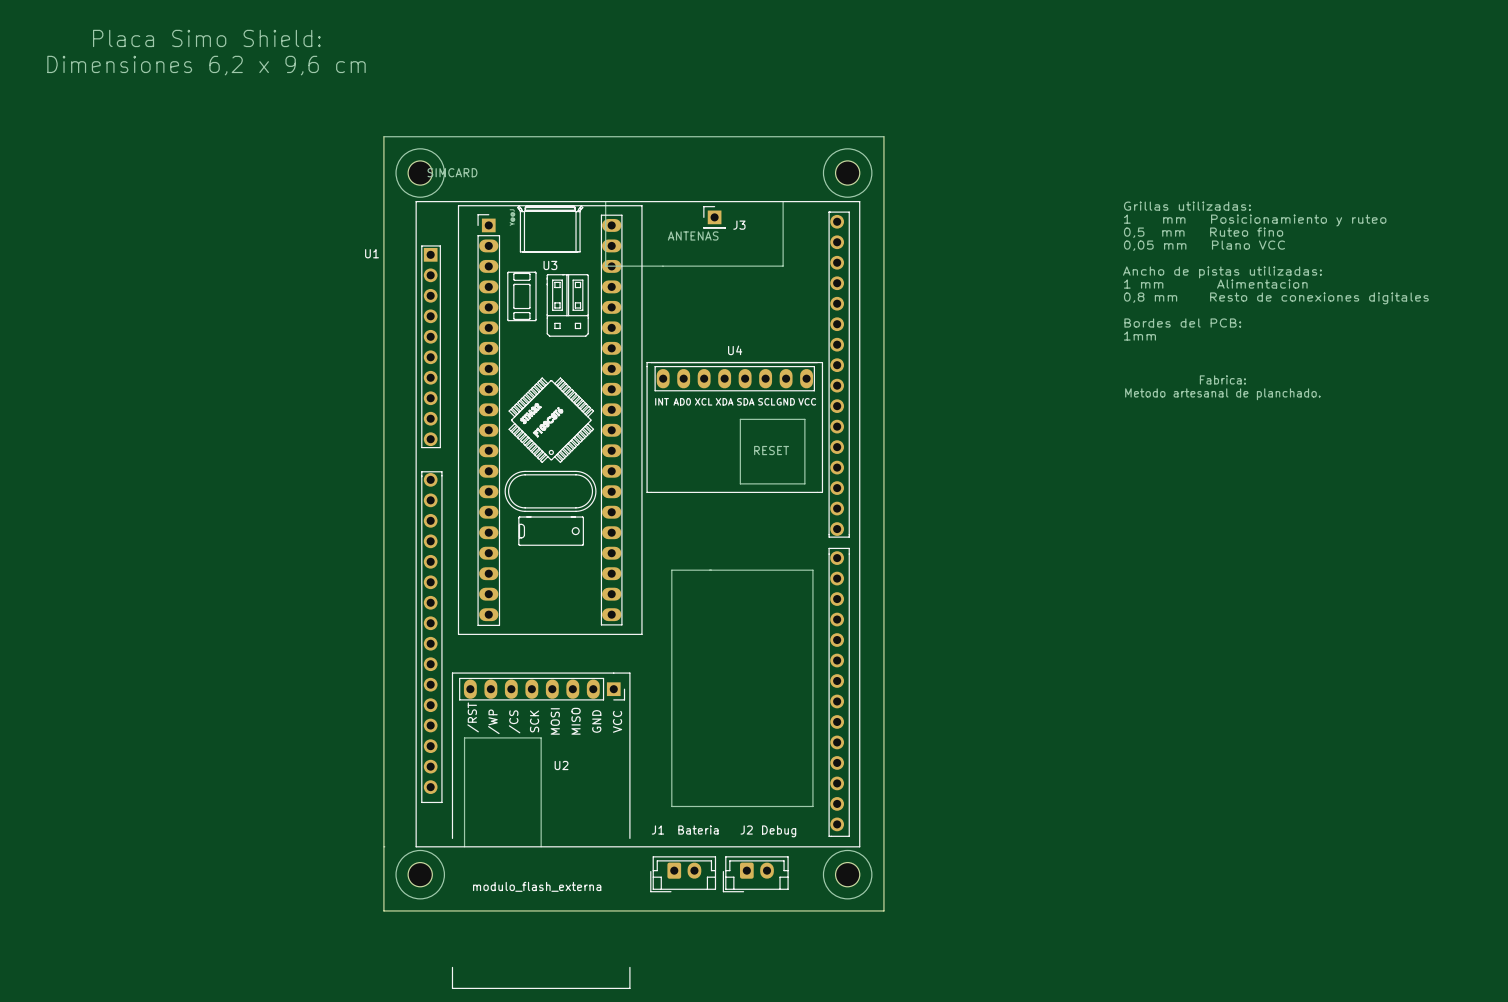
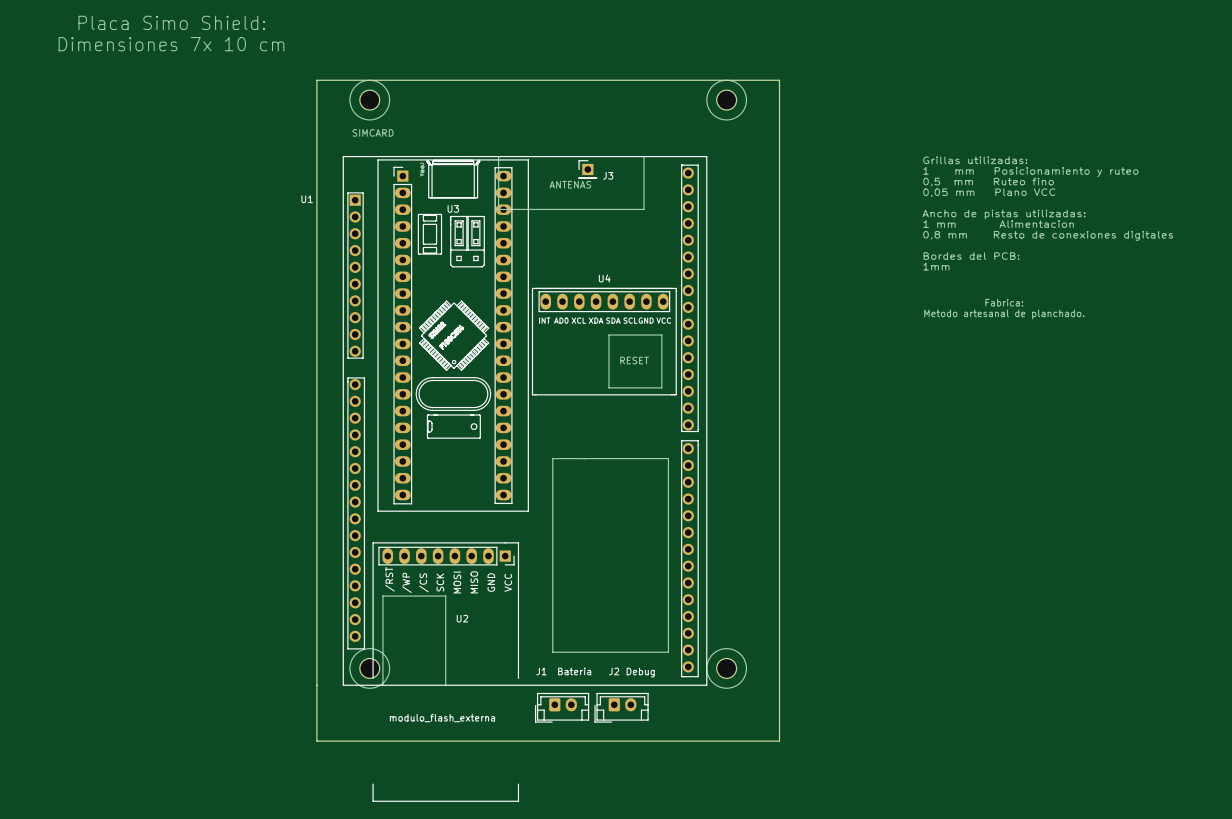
text: Dimensiones 6,2 x 9,6 cm (206, 65) -> Dimensiones 7x 10 cm (171, 44)
line: (383, 136) (883, 136) -> none
board edge: (883, 136) (883, 910) (383, 910) -> (316, 103) (316, 80) (779, 80) (779, 741) (316, 741) (316, 737)
part position: (420, 173) -> (369, 100)
part position: (847, 173) -> (726, 100)
part position: (420, 874) -> (369, 668)
part position: (847, 874) -> (726, 668)

